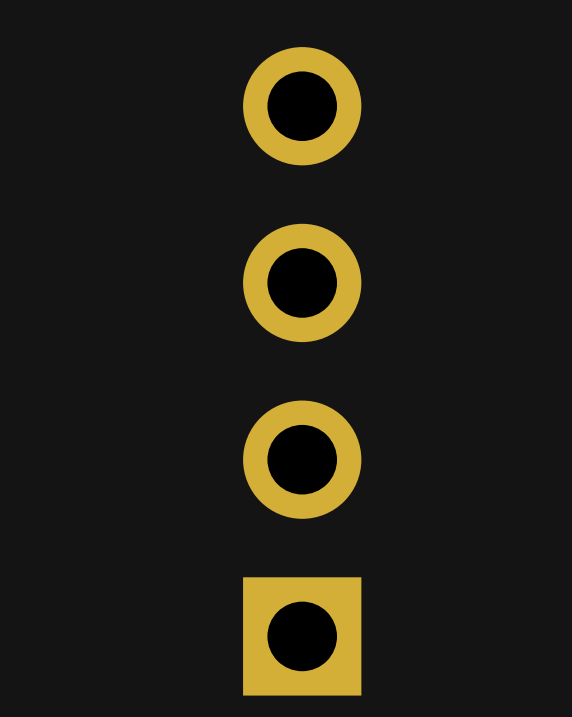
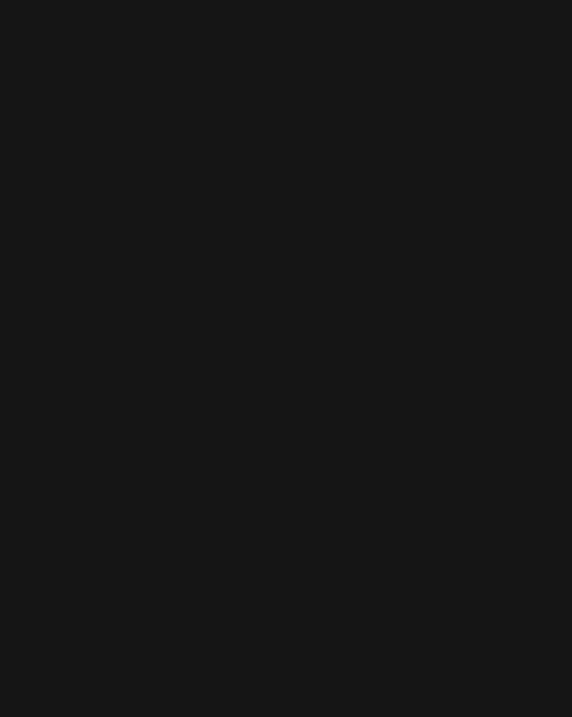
part: (302, 371) -> none

